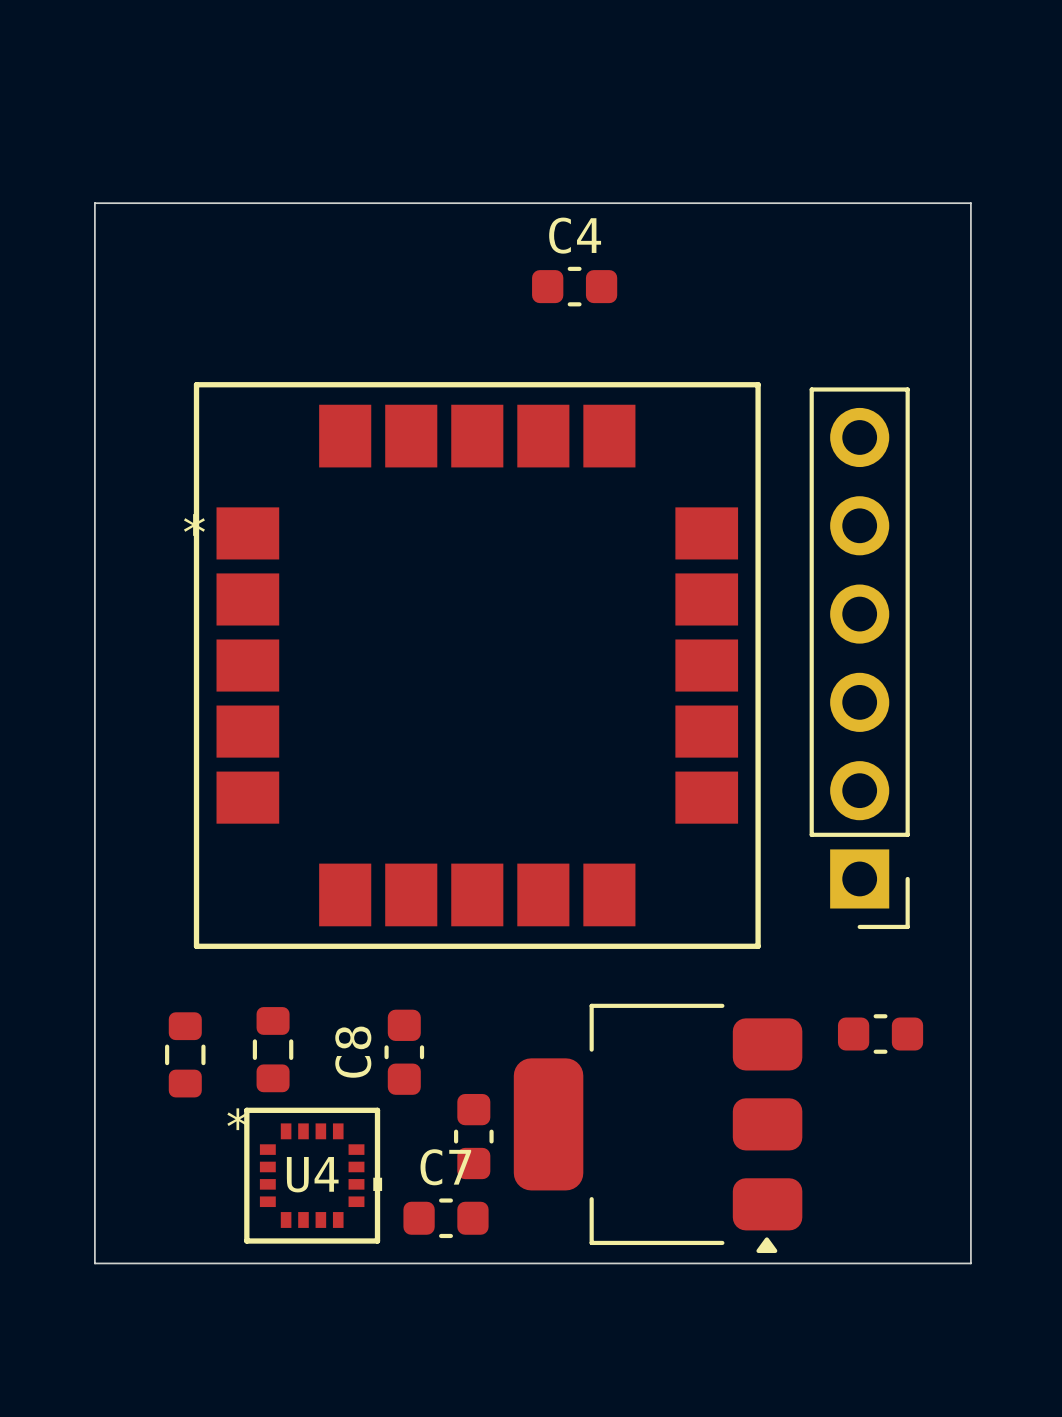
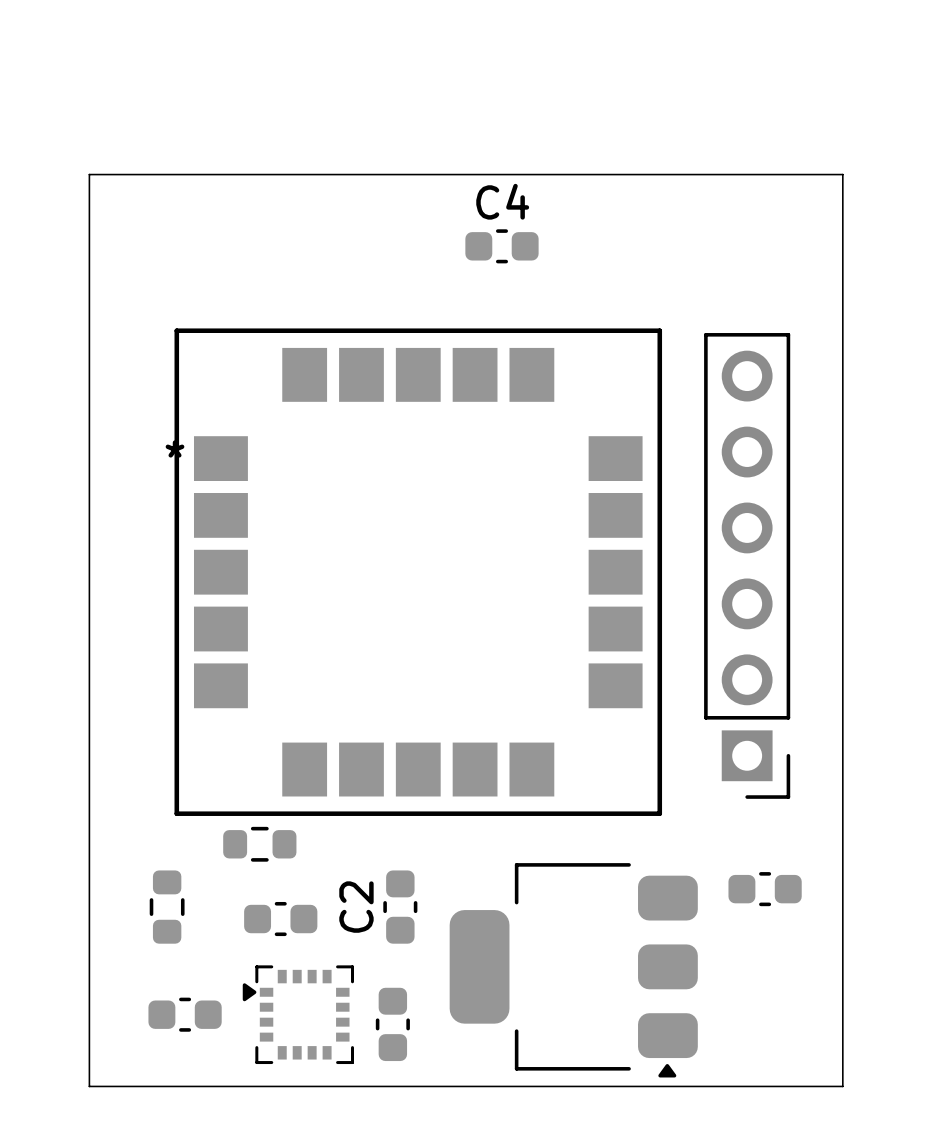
part rotation: 0° (273, 1049) -> 90° clockwise (259, 844)
part position: (273, 1049) -> (259, 844)
C8: (404, 1052) -> none
C2: none -> (400, 907)
part: none -> (280, 919)
part position: (473, 1136) -> (392, 1024)
U4: (313, 1175) -> none
part: none -> (185, 1014)
part: none -> (298, 1014)
C7: (446, 1218) -> none

